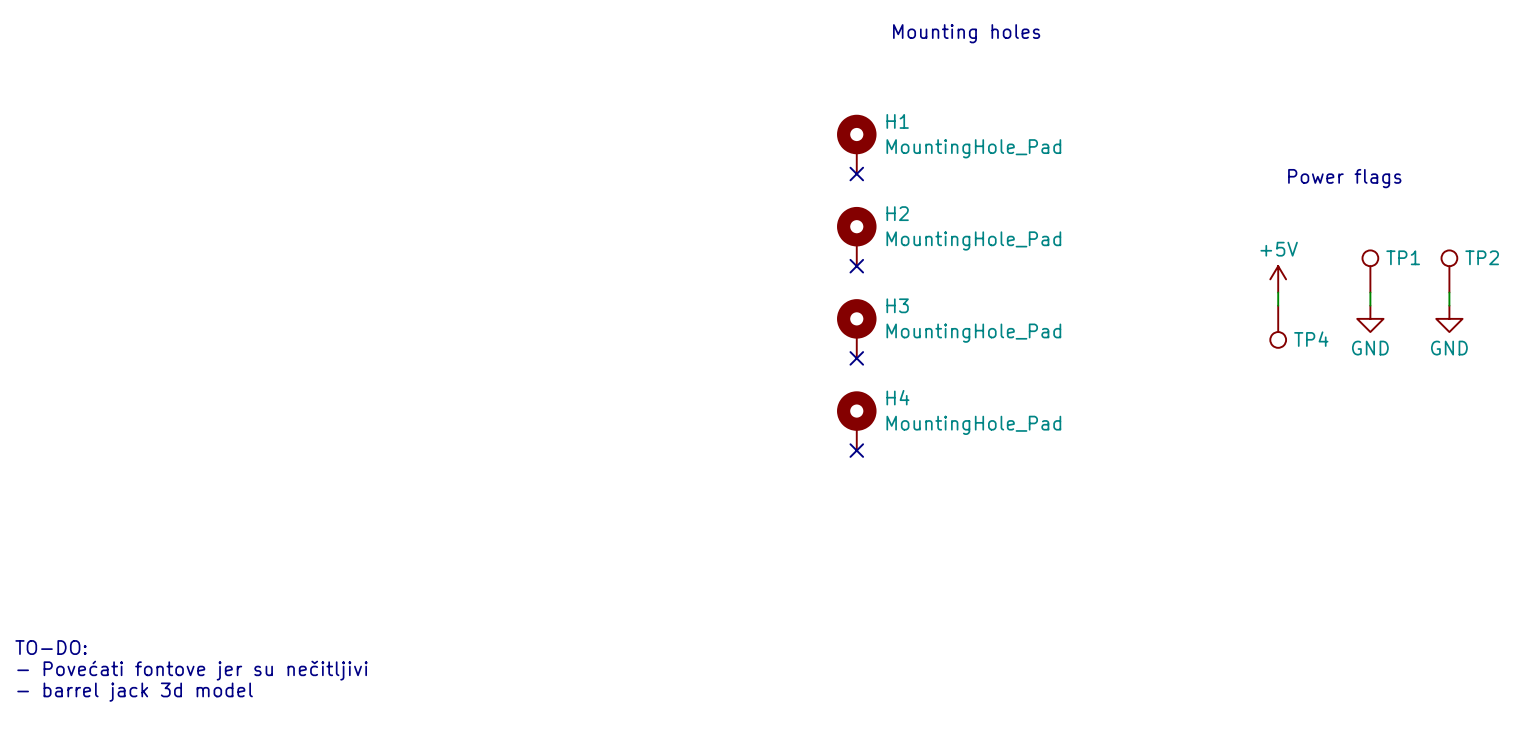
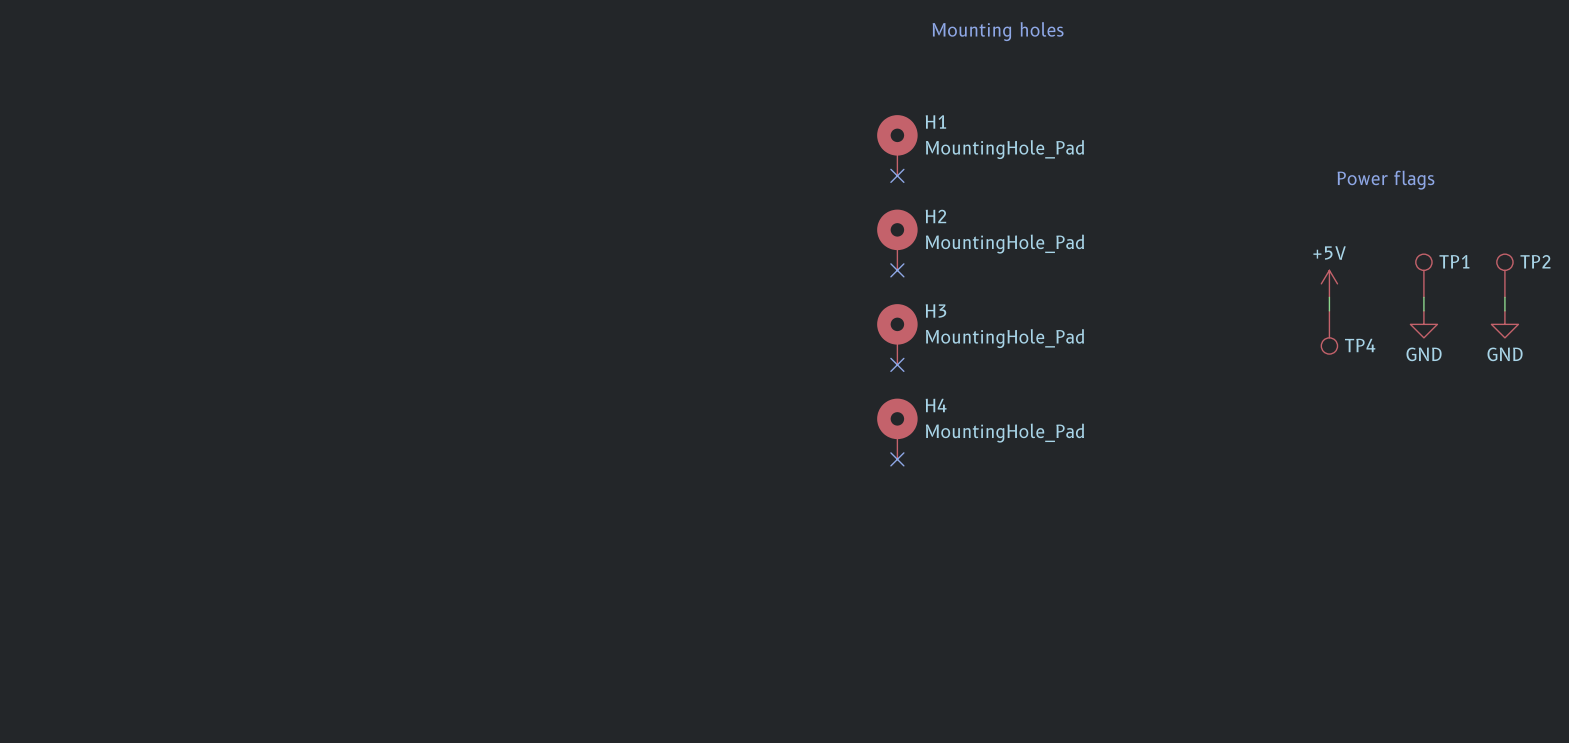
text: TO-DO: (51, 647) -> none
text: - Povećati fontove jer su nečitljivi (192, 670) -> none
text: - barrel jack 3d model (135, 692) -> none

